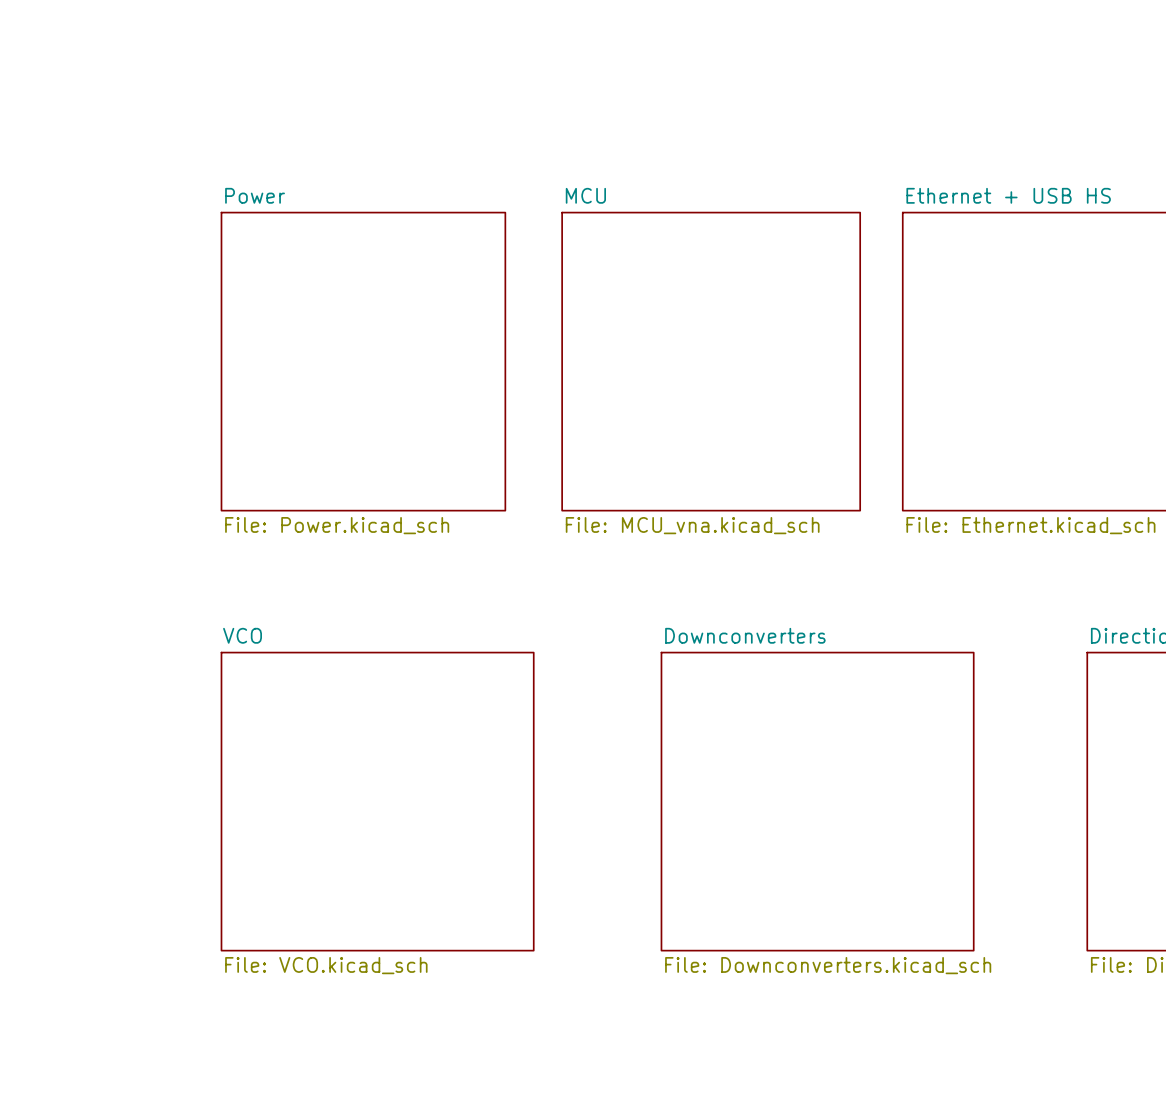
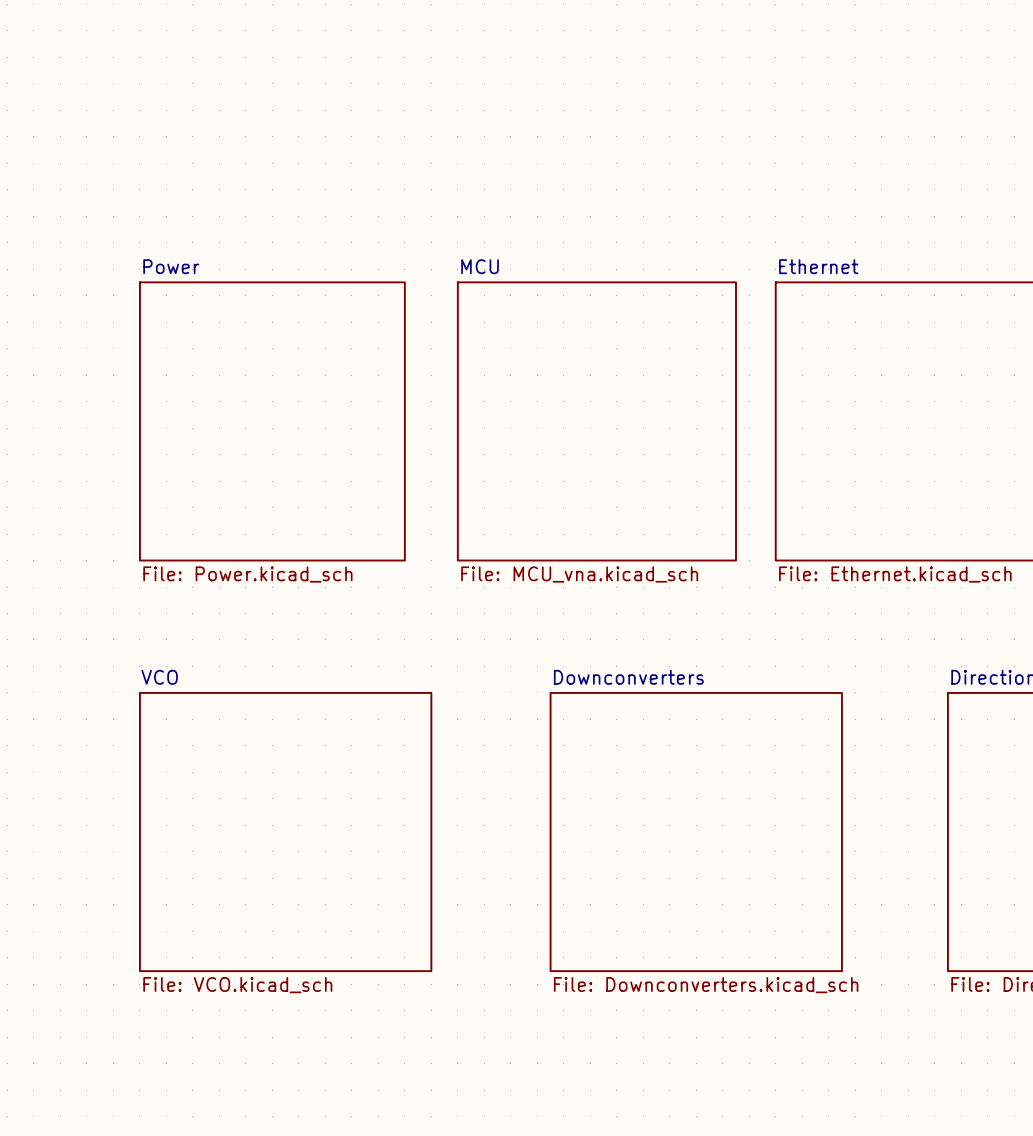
sheet Ethernet + USB HS name: Ethernet + USB HS (1008, 195) -> Ethernet (818, 266)

